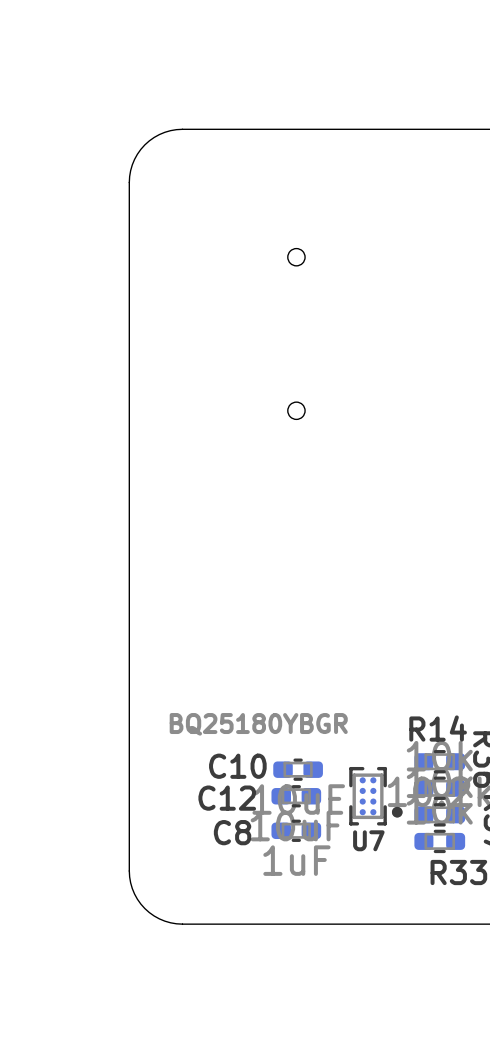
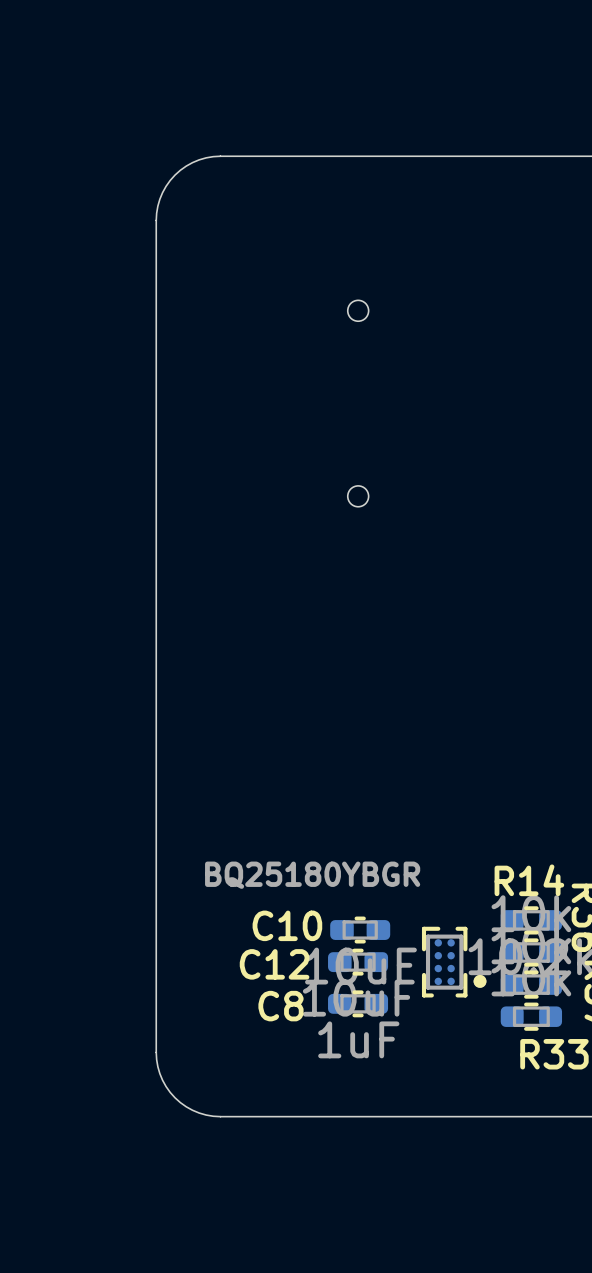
U7 name: U7 (368, 840) -> none

